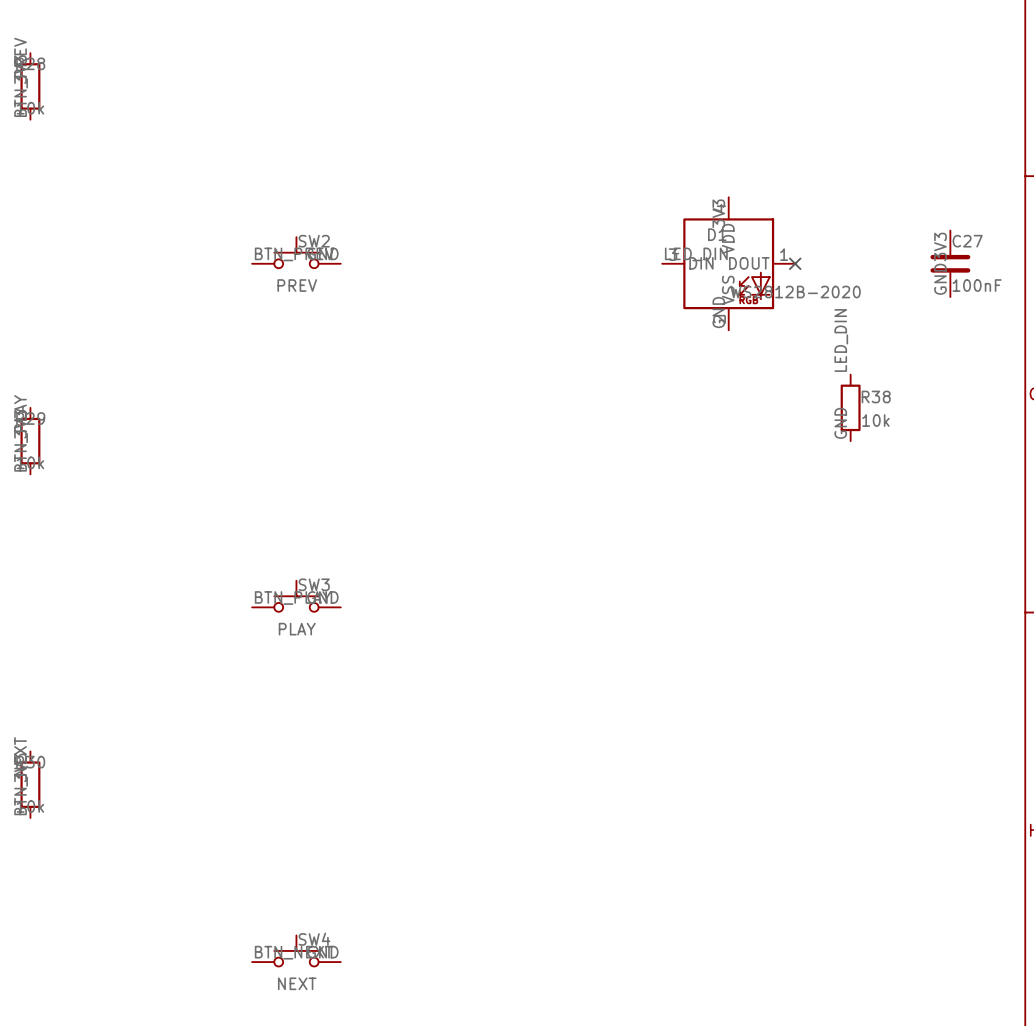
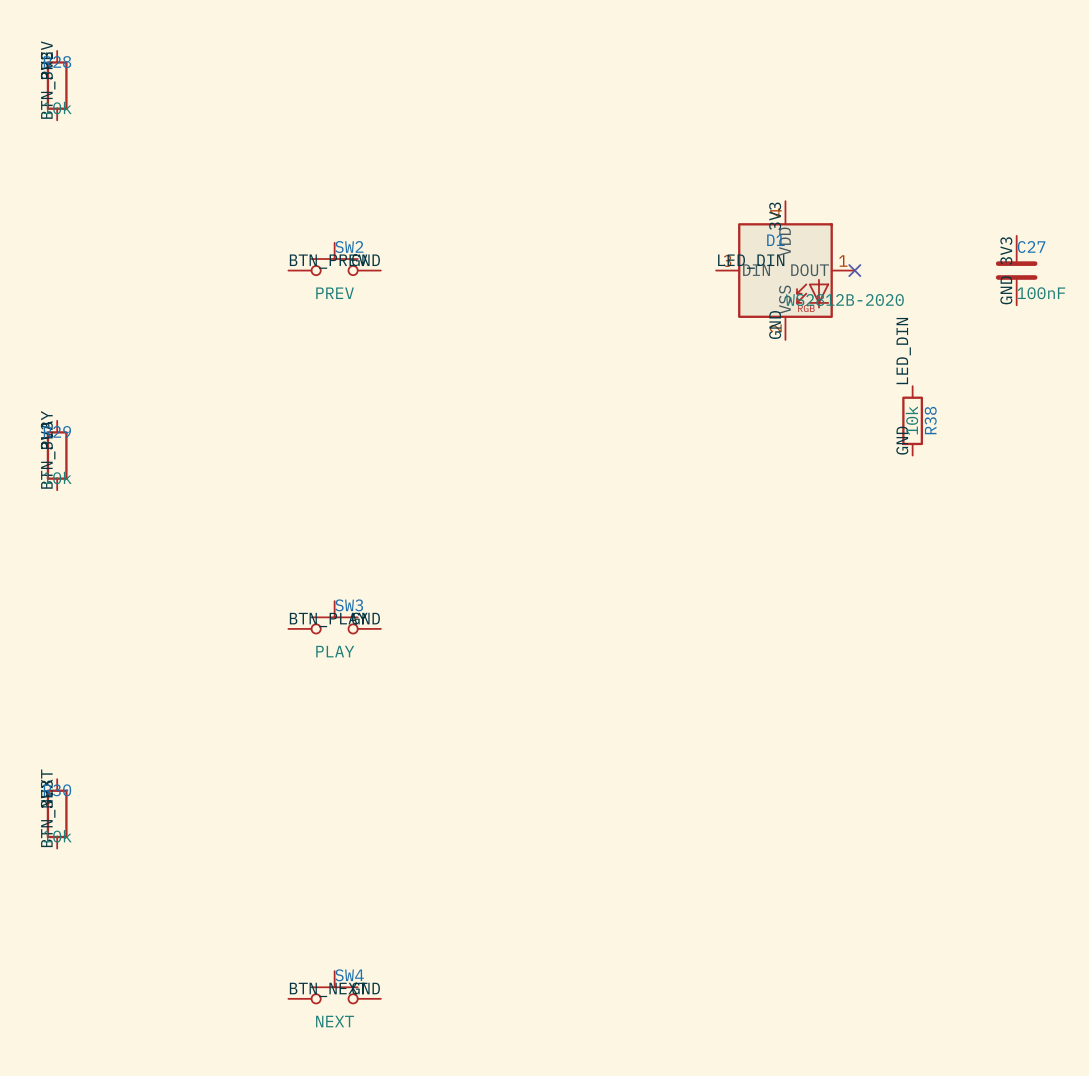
R38 name rotation: 0° (876, 396) -> 90° counterclockwise (930, 420)
R38 value rotation: 0° (875, 420) -> 90° counterclockwise (911, 420)

